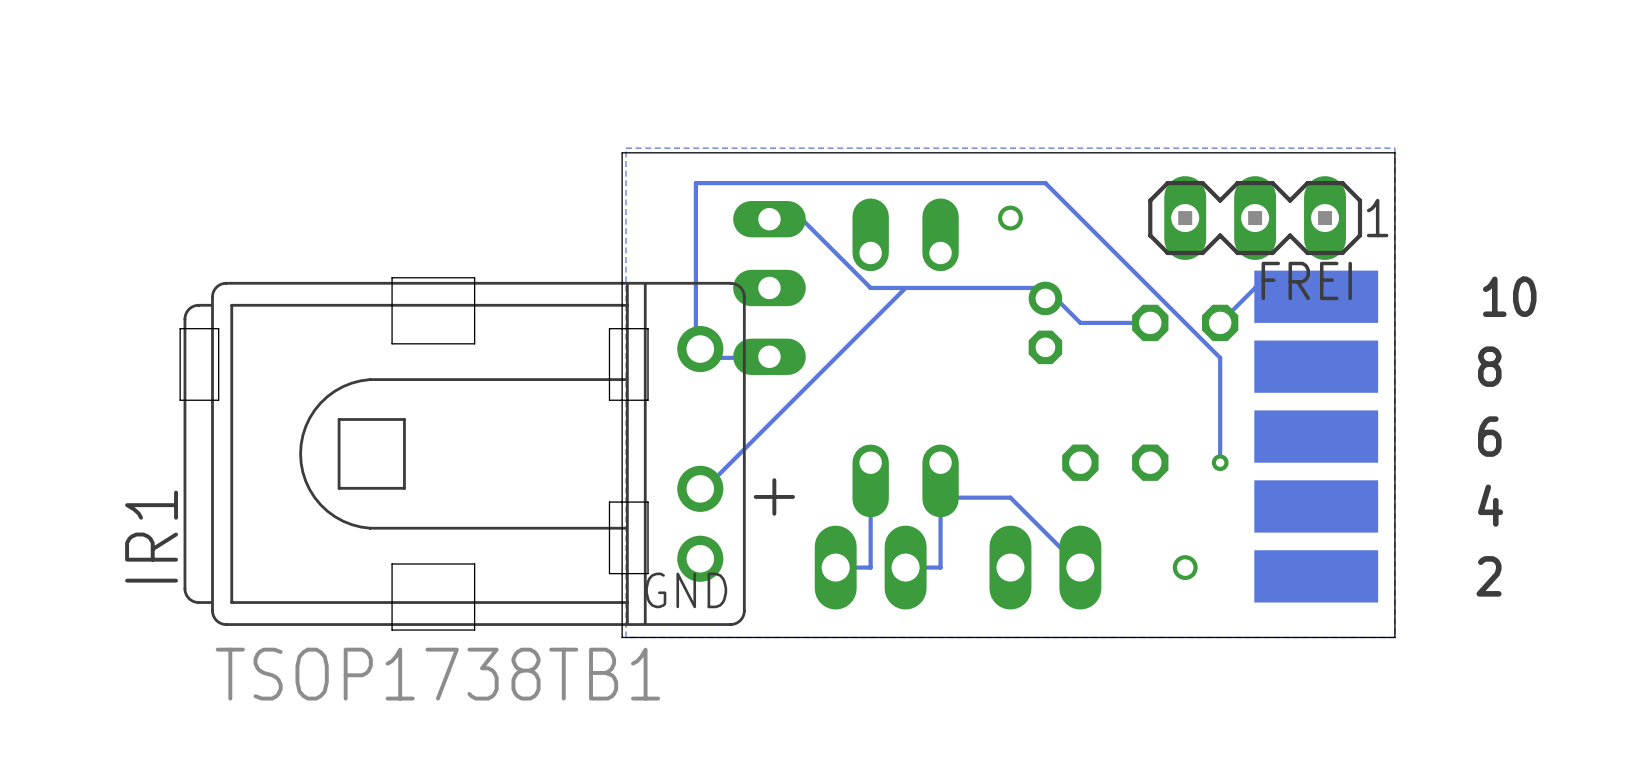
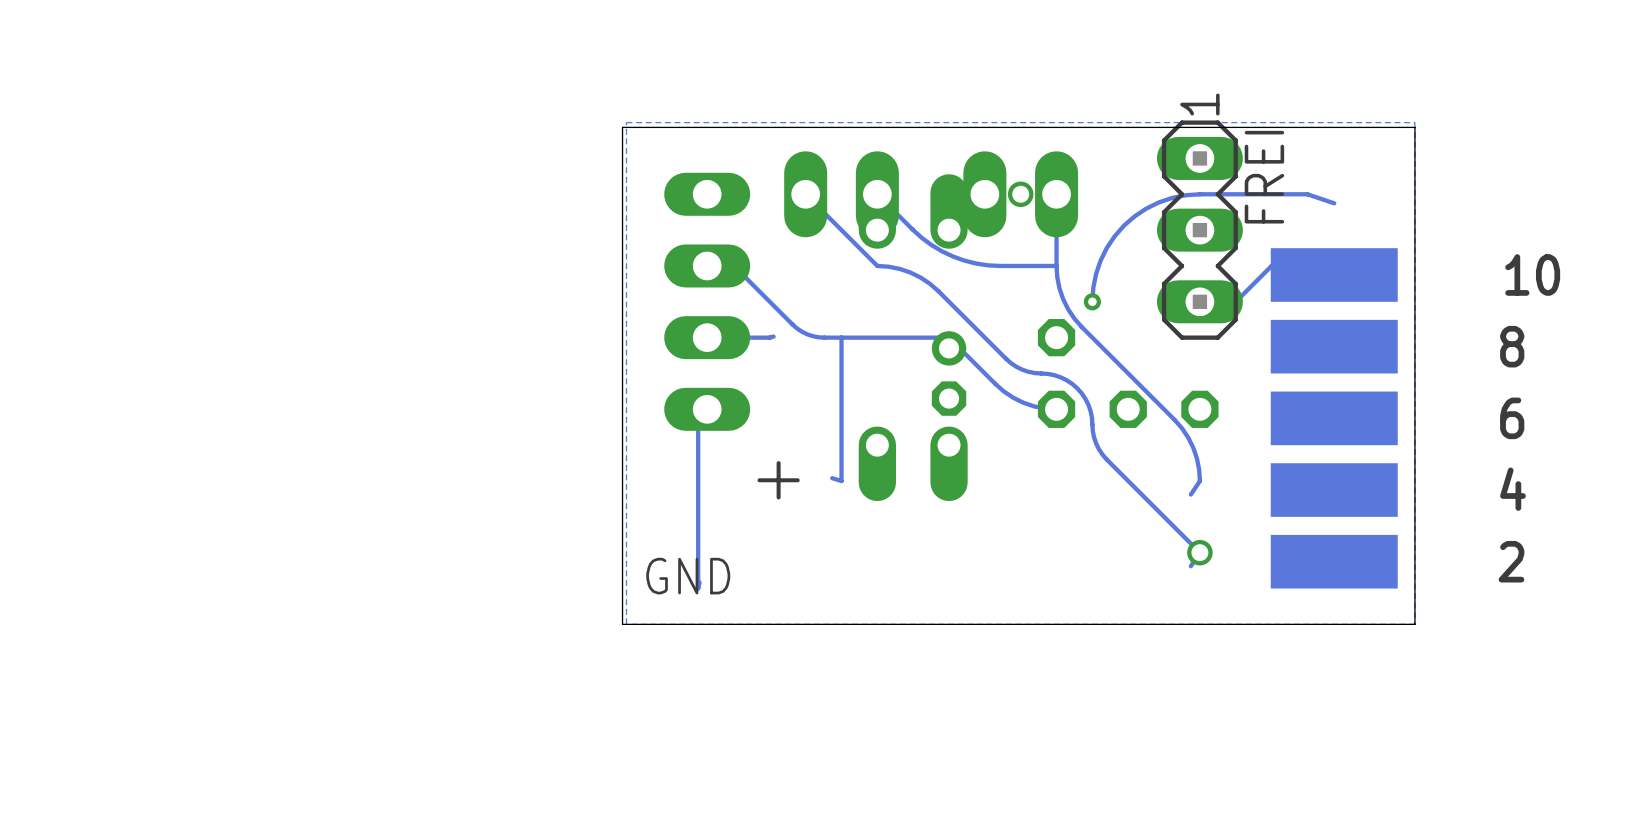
part: none -> (841, 194)
part: none -> (1020, 194)
track: none -> (1056, 194) (1056, 265) (1063, 299) (1081, 327) (1174, 419) (1188, 437) (1196, 458) (1199, 481) (1190, 494)
FREI rotation: 0° (1255, 218) -> 90° counterclockwise (1199, 230)
track: none -> (1334, 203) (1307, 194) (1199, 194) (1185, 195) (1158, 202) (1134, 216) (1114, 236) (1106, 248) (1096, 273) (1092, 301)
track: none -> (707, 265) (734, 265) (795, 327) (811, 335) (824, 337) (949, 337)
part: (769, 287) -> none
track: none -> (877, 265) (899, 268) (930, 283) (1016, 366) (1028, 371) (1060, 377) (1077, 388) (1088, 405) (1094, 437) (1102, 454) (1199, 552) (1190, 566)
track: (905, 287) (695, 497) (700, 488) -> none
track: (990, 287) (870, 287) -> (1000, 265) (964, 260) (941, 251) (921, 237) (877, 194)
track: (1045, 298) (1045, 288) (1080, 322) (1150, 322) -> none
part: none -> (707, 301)
part position: (1045, 322) -> (949, 373)
via: none -> (1092, 301)
part: (1185, 322) -> none
track: (700, 349) (695, 357) (695, 183) (1045, 183) (1220, 357) (1220, 462) -> none
track: none -> (841, 337) (841, 481) (832, 478)
track: none -> (949, 337) (995, 383) (1013, 397) (1034, 406) (1056, 409)
part: none -> (1056, 373)
track: none -> (707, 409) (698, 409) (698, 588) (699, 582)
part: none -> (1164, 409)
IR1: TSOP1738TB1 (462, 453) -> none
track: (870, 462) (870, 567) (835, 567) -> none
track: (940, 462) (940, 567) (905, 567) -> none
part: (1115, 462) -> none
via: (1220, 462) -> none
track: (940, 497) (1010, 497) (1080, 567) -> none
part: (870, 567) -> none
part: (1045, 567) -> none

